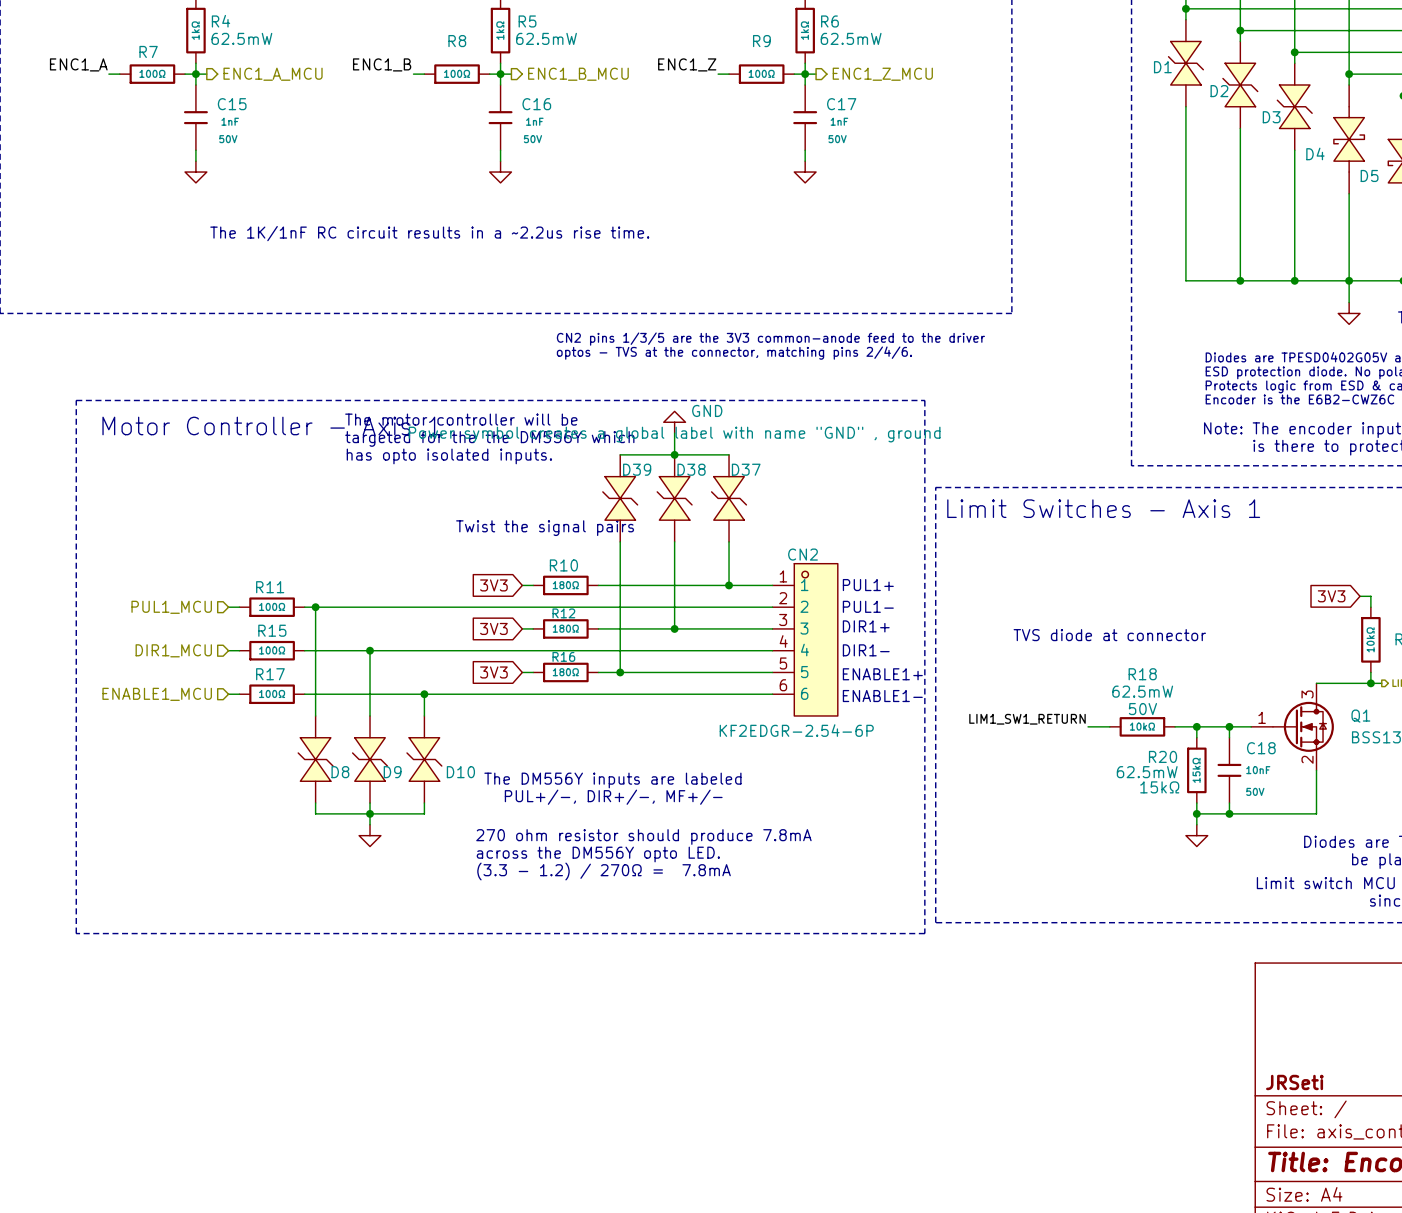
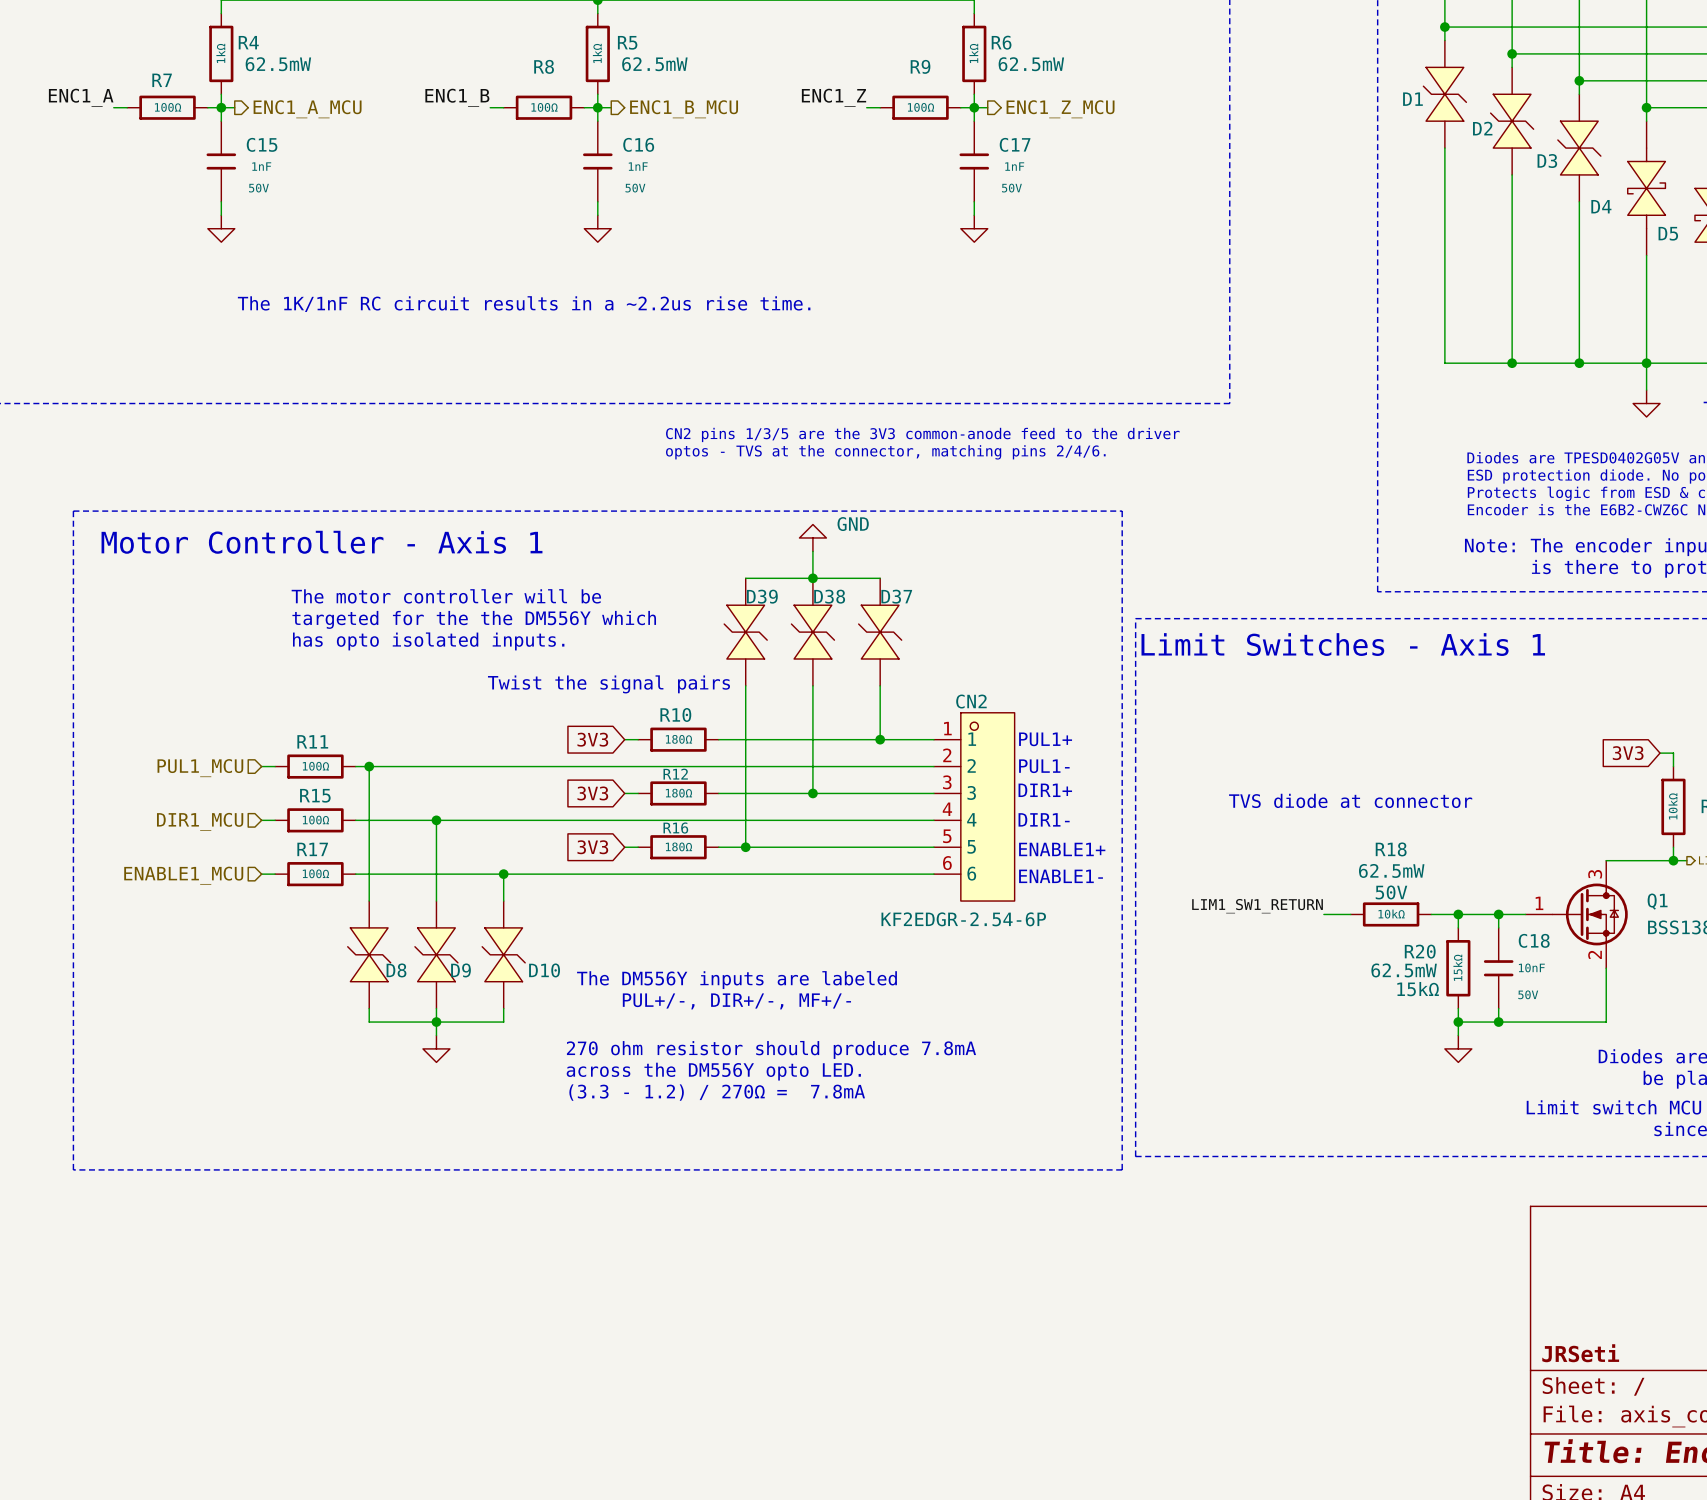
text position: The motor controller will be (461, 419) -> The motor controller will be (446, 596)
power symbol text: Power symbol creates a global label with name "GND" , ground (674, 434) -> none
text position: targeted for the the DM556Y which (489, 438) -> targeted for the the DM556Y which (474, 619)
text position: has opto isolated inputs. (449, 456) -> has opto isolated inputs. (428, 641)
text position: Twist the signal pairs (545, 528) -> Twist the signal pairs (608, 684)

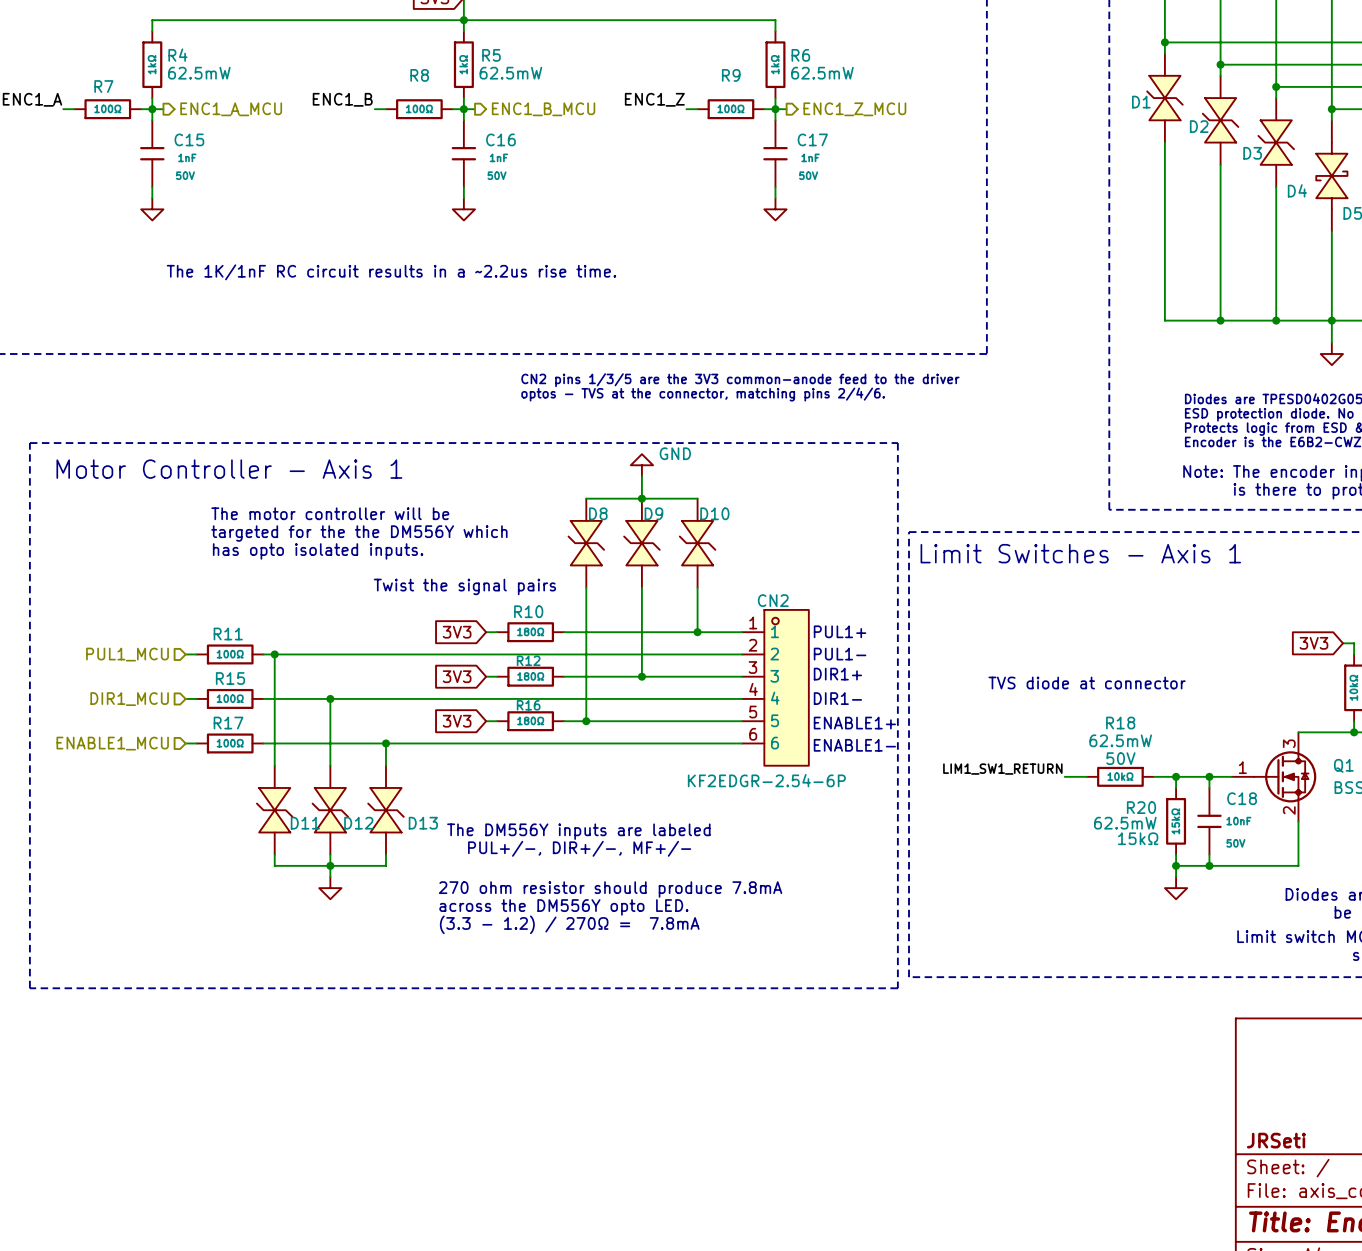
D39 name: D39 (762, 596) -> D8 (598, 513)
D38 name: D38 (829, 596) -> D9 (653, 513)
D37 name: D37 (896, 596) -> D10 (714, 513)
D8 name: D8 (396, 970) -> D11 (305, 823)
D9 name: D9 (460, 970) -> D12 (358, 823)
D10 name: D10 (544, 970) -> D13 (423, 823)

